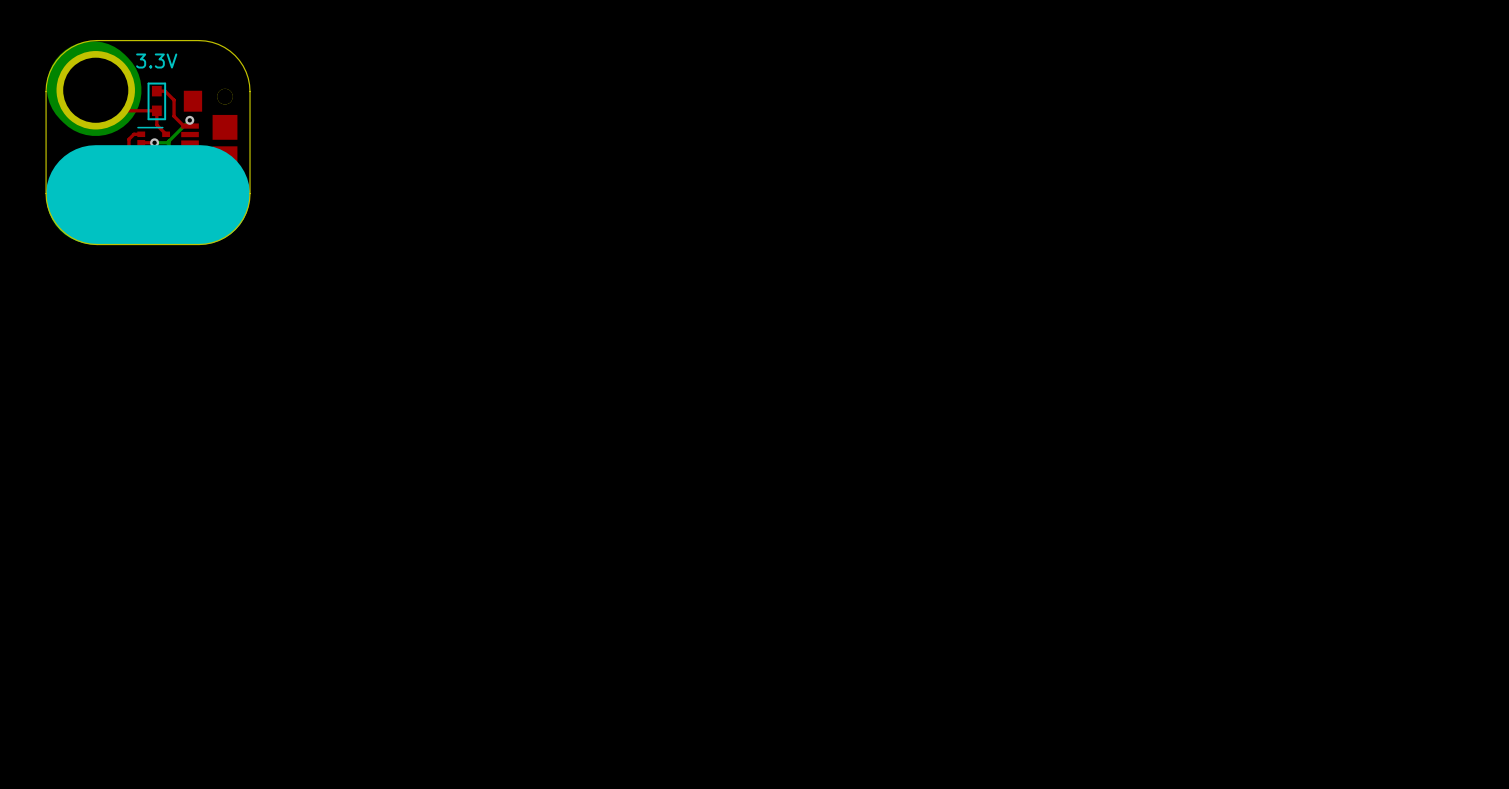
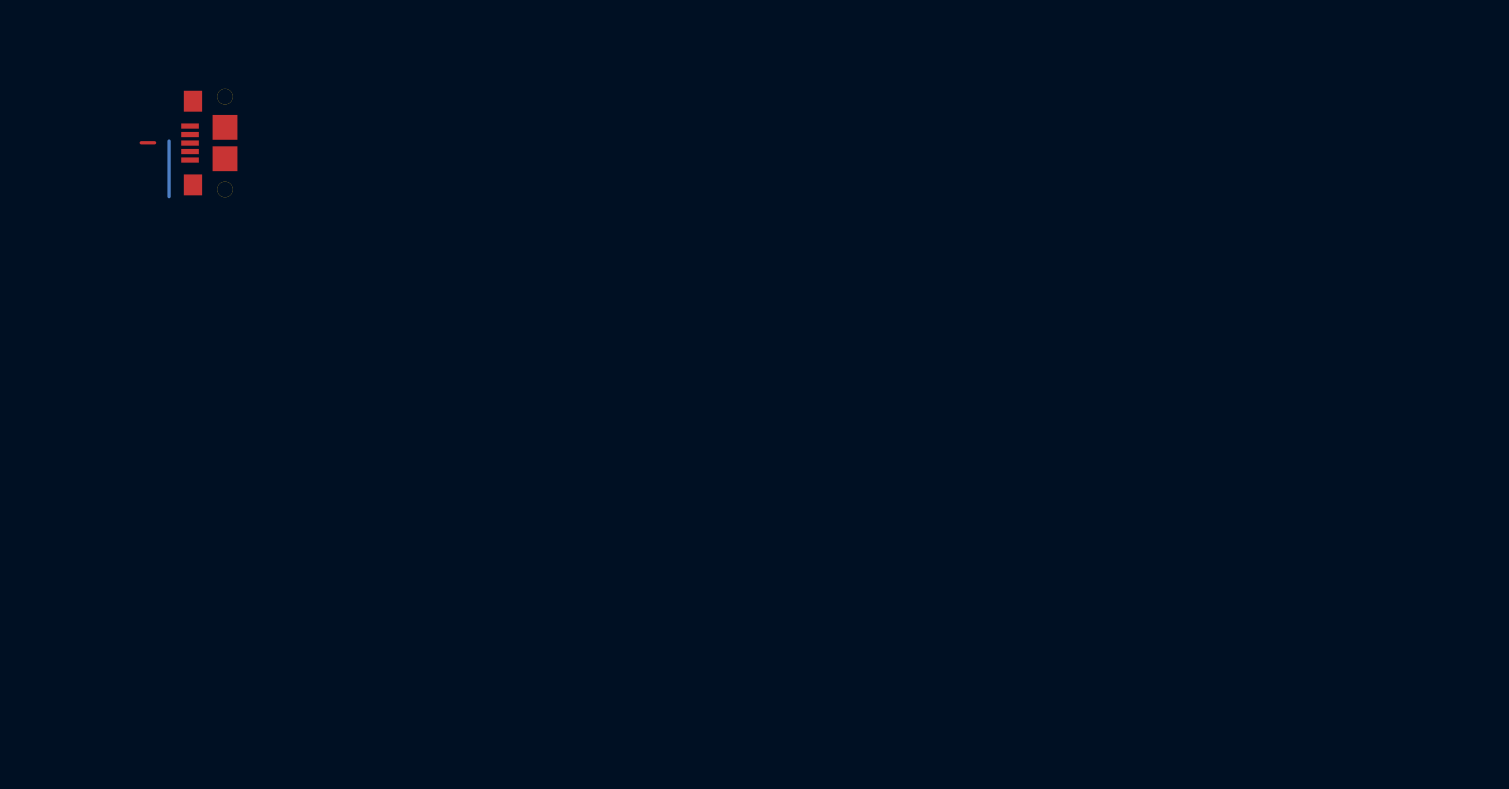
top track: (156, 91) (165, 91) (174, 100) (174, 116) (183, 126) (190, 126) (189, 120) -> none
part: (156, 101) -> none
top track: (118, 110) (156, 110) (156, 125) (166, 134) -> none
bottom track: (189, 120) (167, 142) (154, 142) -> none
via: (189, 120) -> none
top track: (141, 134) (133, 134) (128, 139) (128, 146) (133, 151) (141, 151) (141, 160) (190, 160) -> none
part: (148, 142) -> none
part: (153, 142) -> none
via: (154, 142) -> none
top track: (156, 160) (156, 176) -> none

